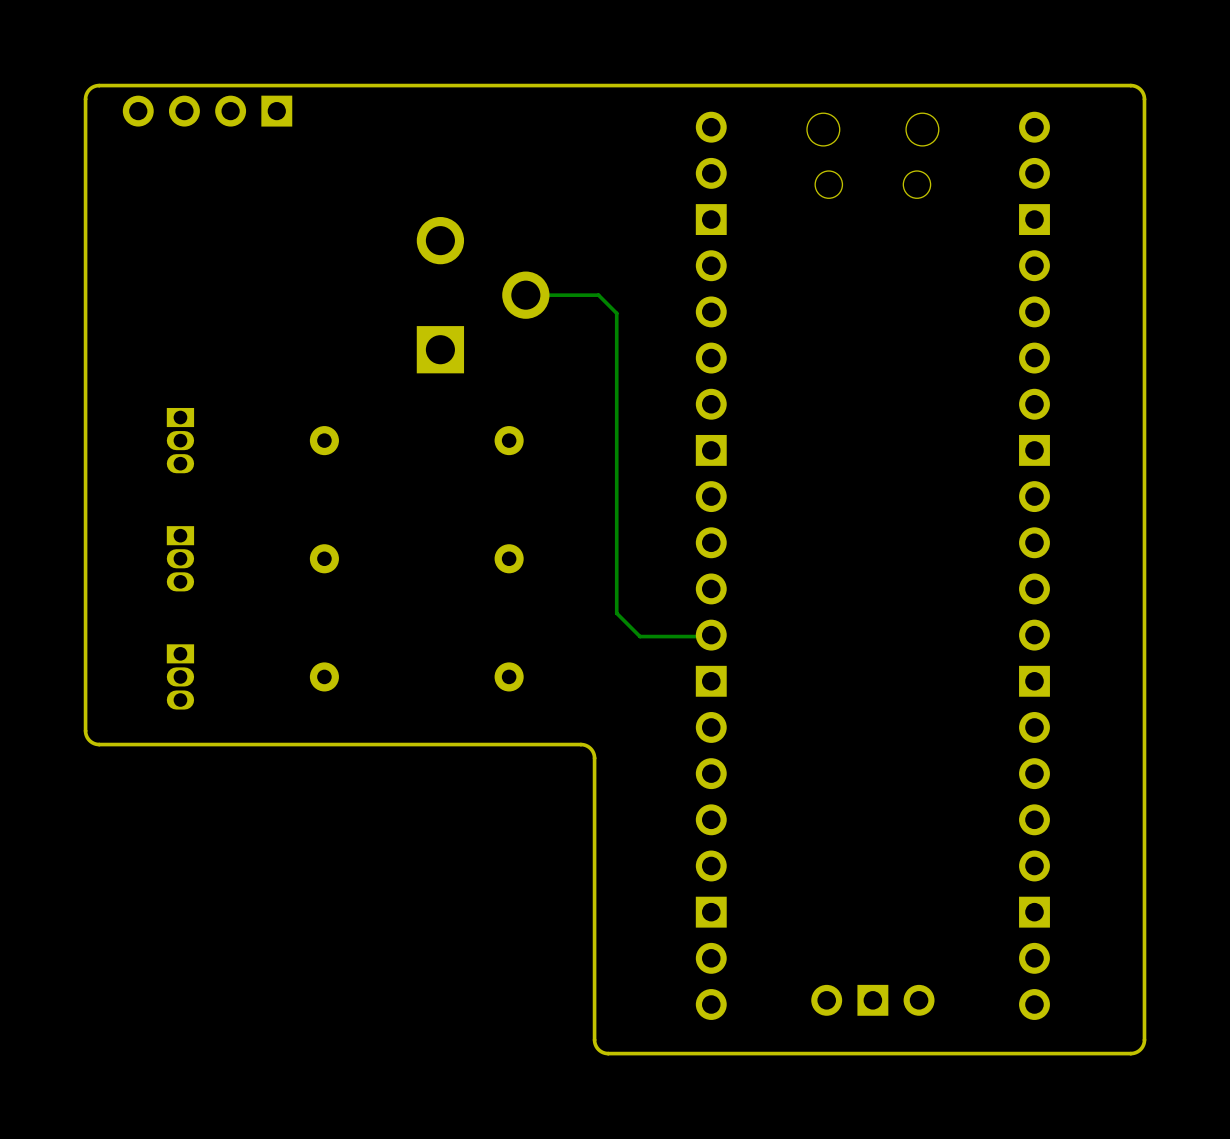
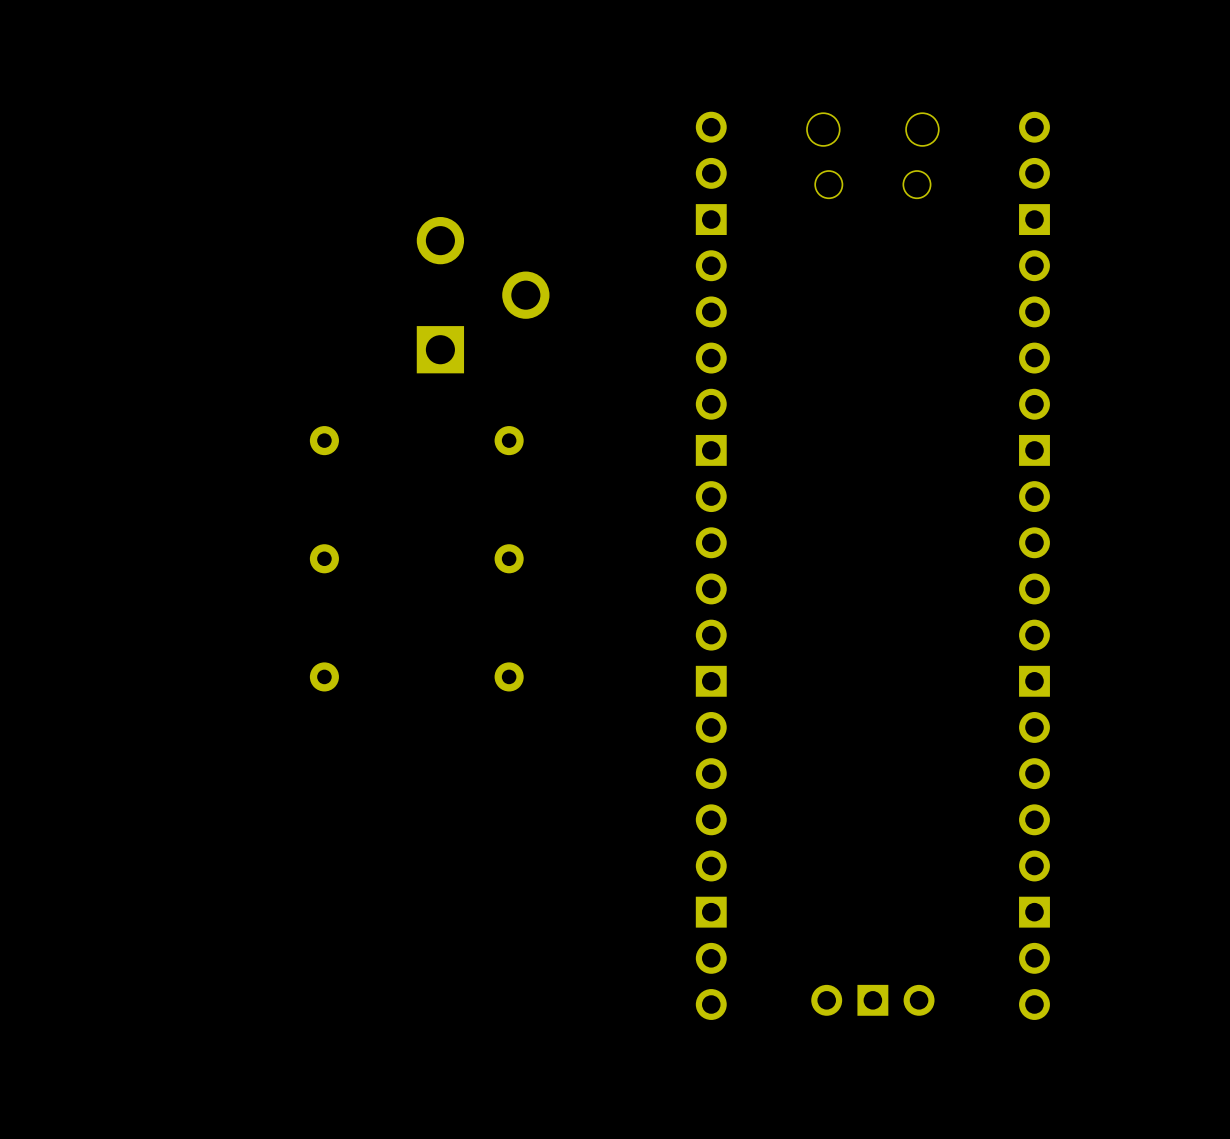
board edge: (1130, 85) (99, 85) (92, 87) (87, 92) (85, 99) (85, 730) (87, 737) (92, 742) (99, 744) (580, 744) (587, 746) (592, 751) (594, 758) (594, 1039) (597, 1048) (604, 1053) (1130, 1053) (1137, 1051) (1142, 1046) (1144, 1039) (1144, 99) (1140, 89) (1130, 85) -> none
part: (207, 111) -> none
track: (525, 295) (598, 295) (616, 313) (616, 613) (640, 636) (711, 636) -> none
part: (180, 440) -> none
part: (180, 558) -> none
part: (180, 676) -> none

